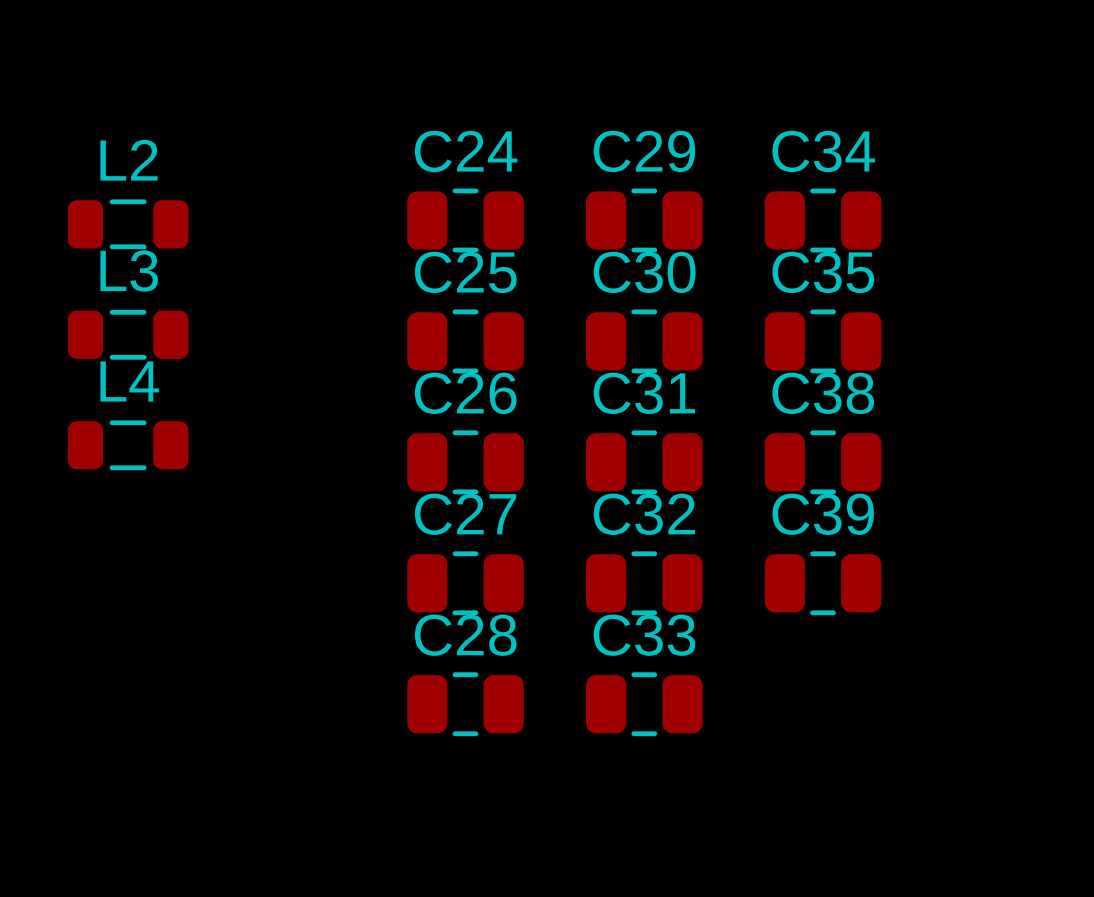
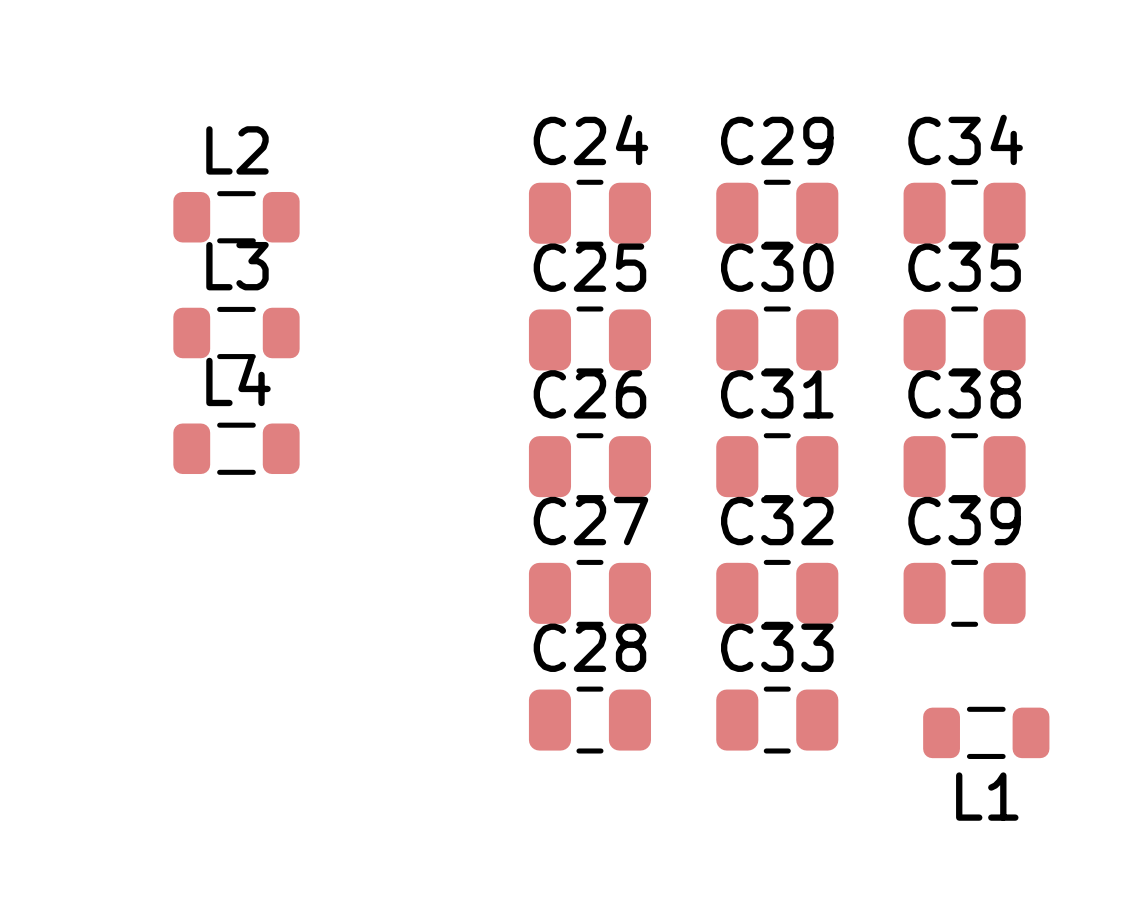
L1: none -> (986, 732)

